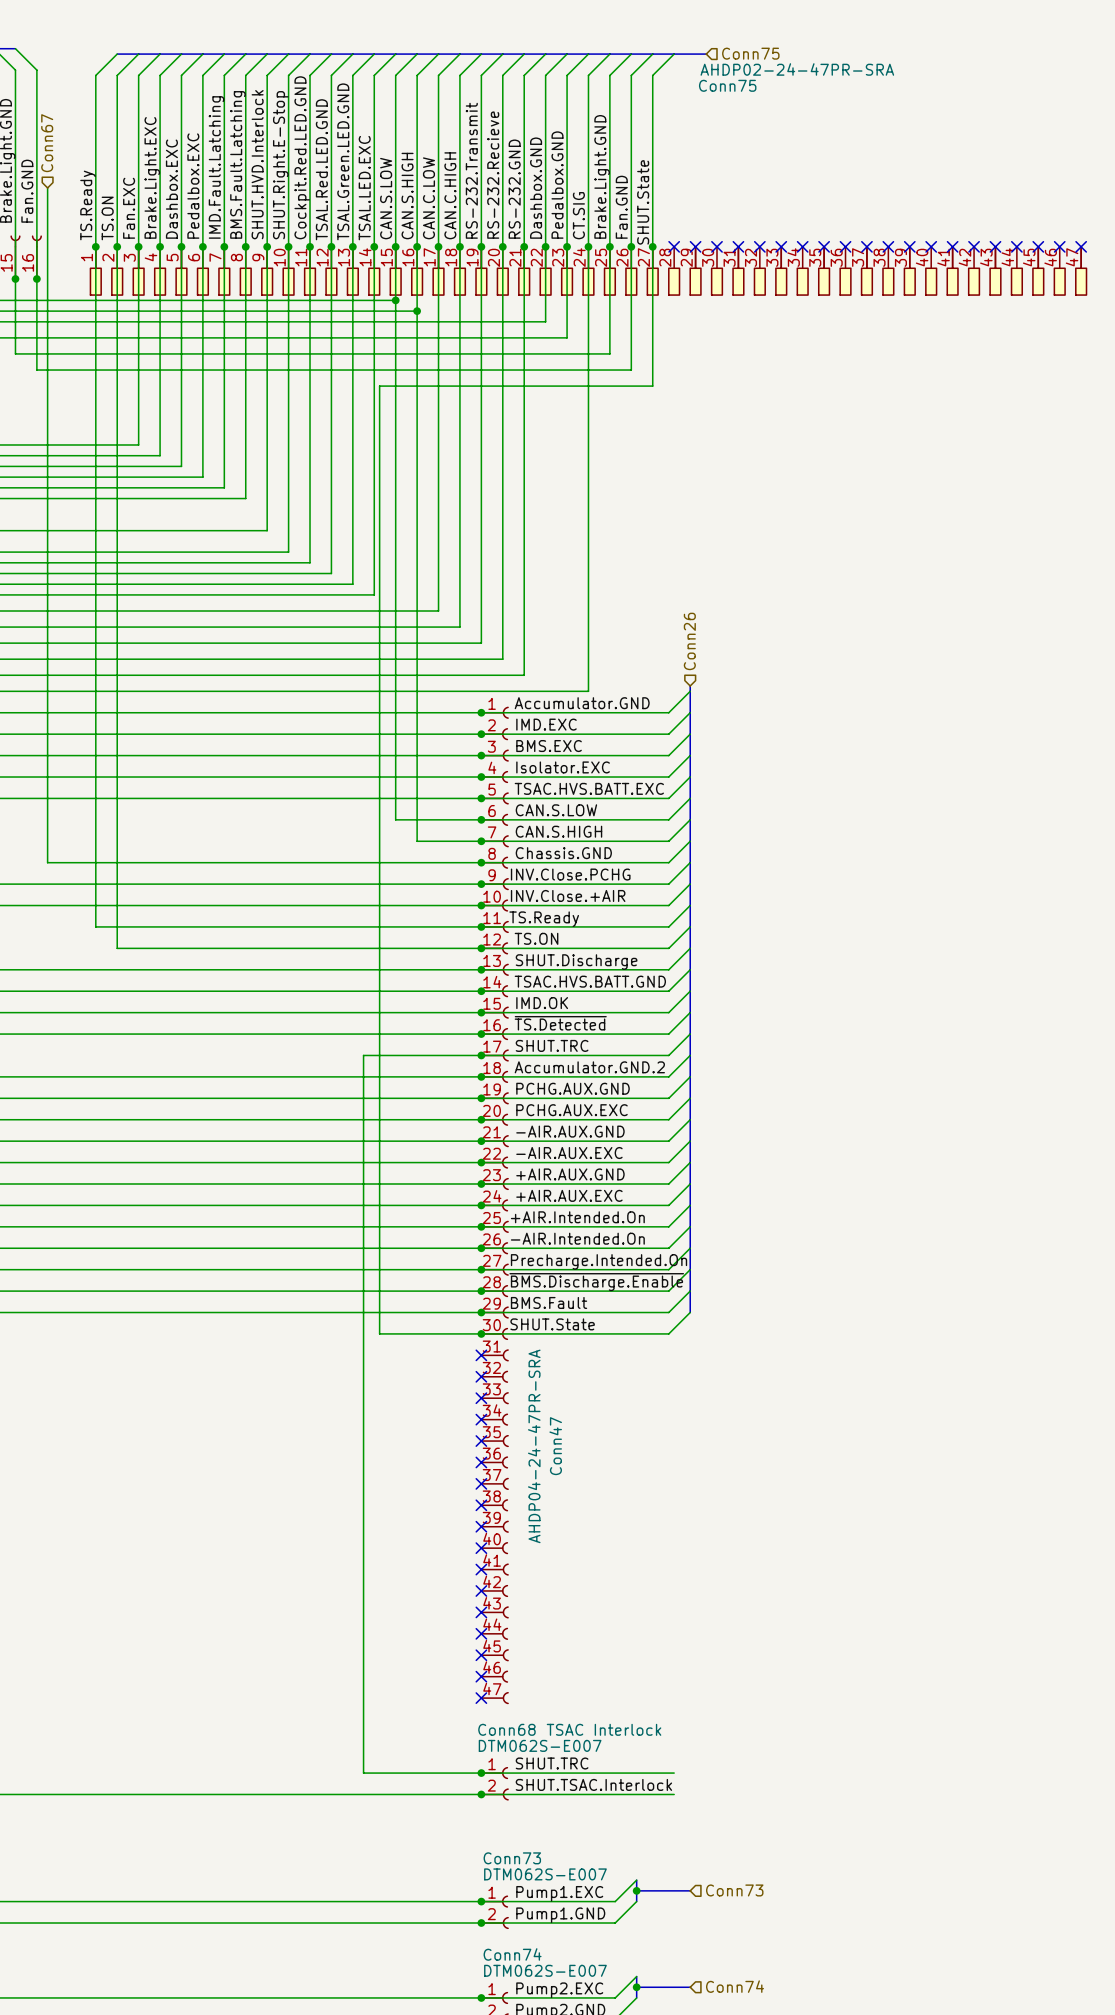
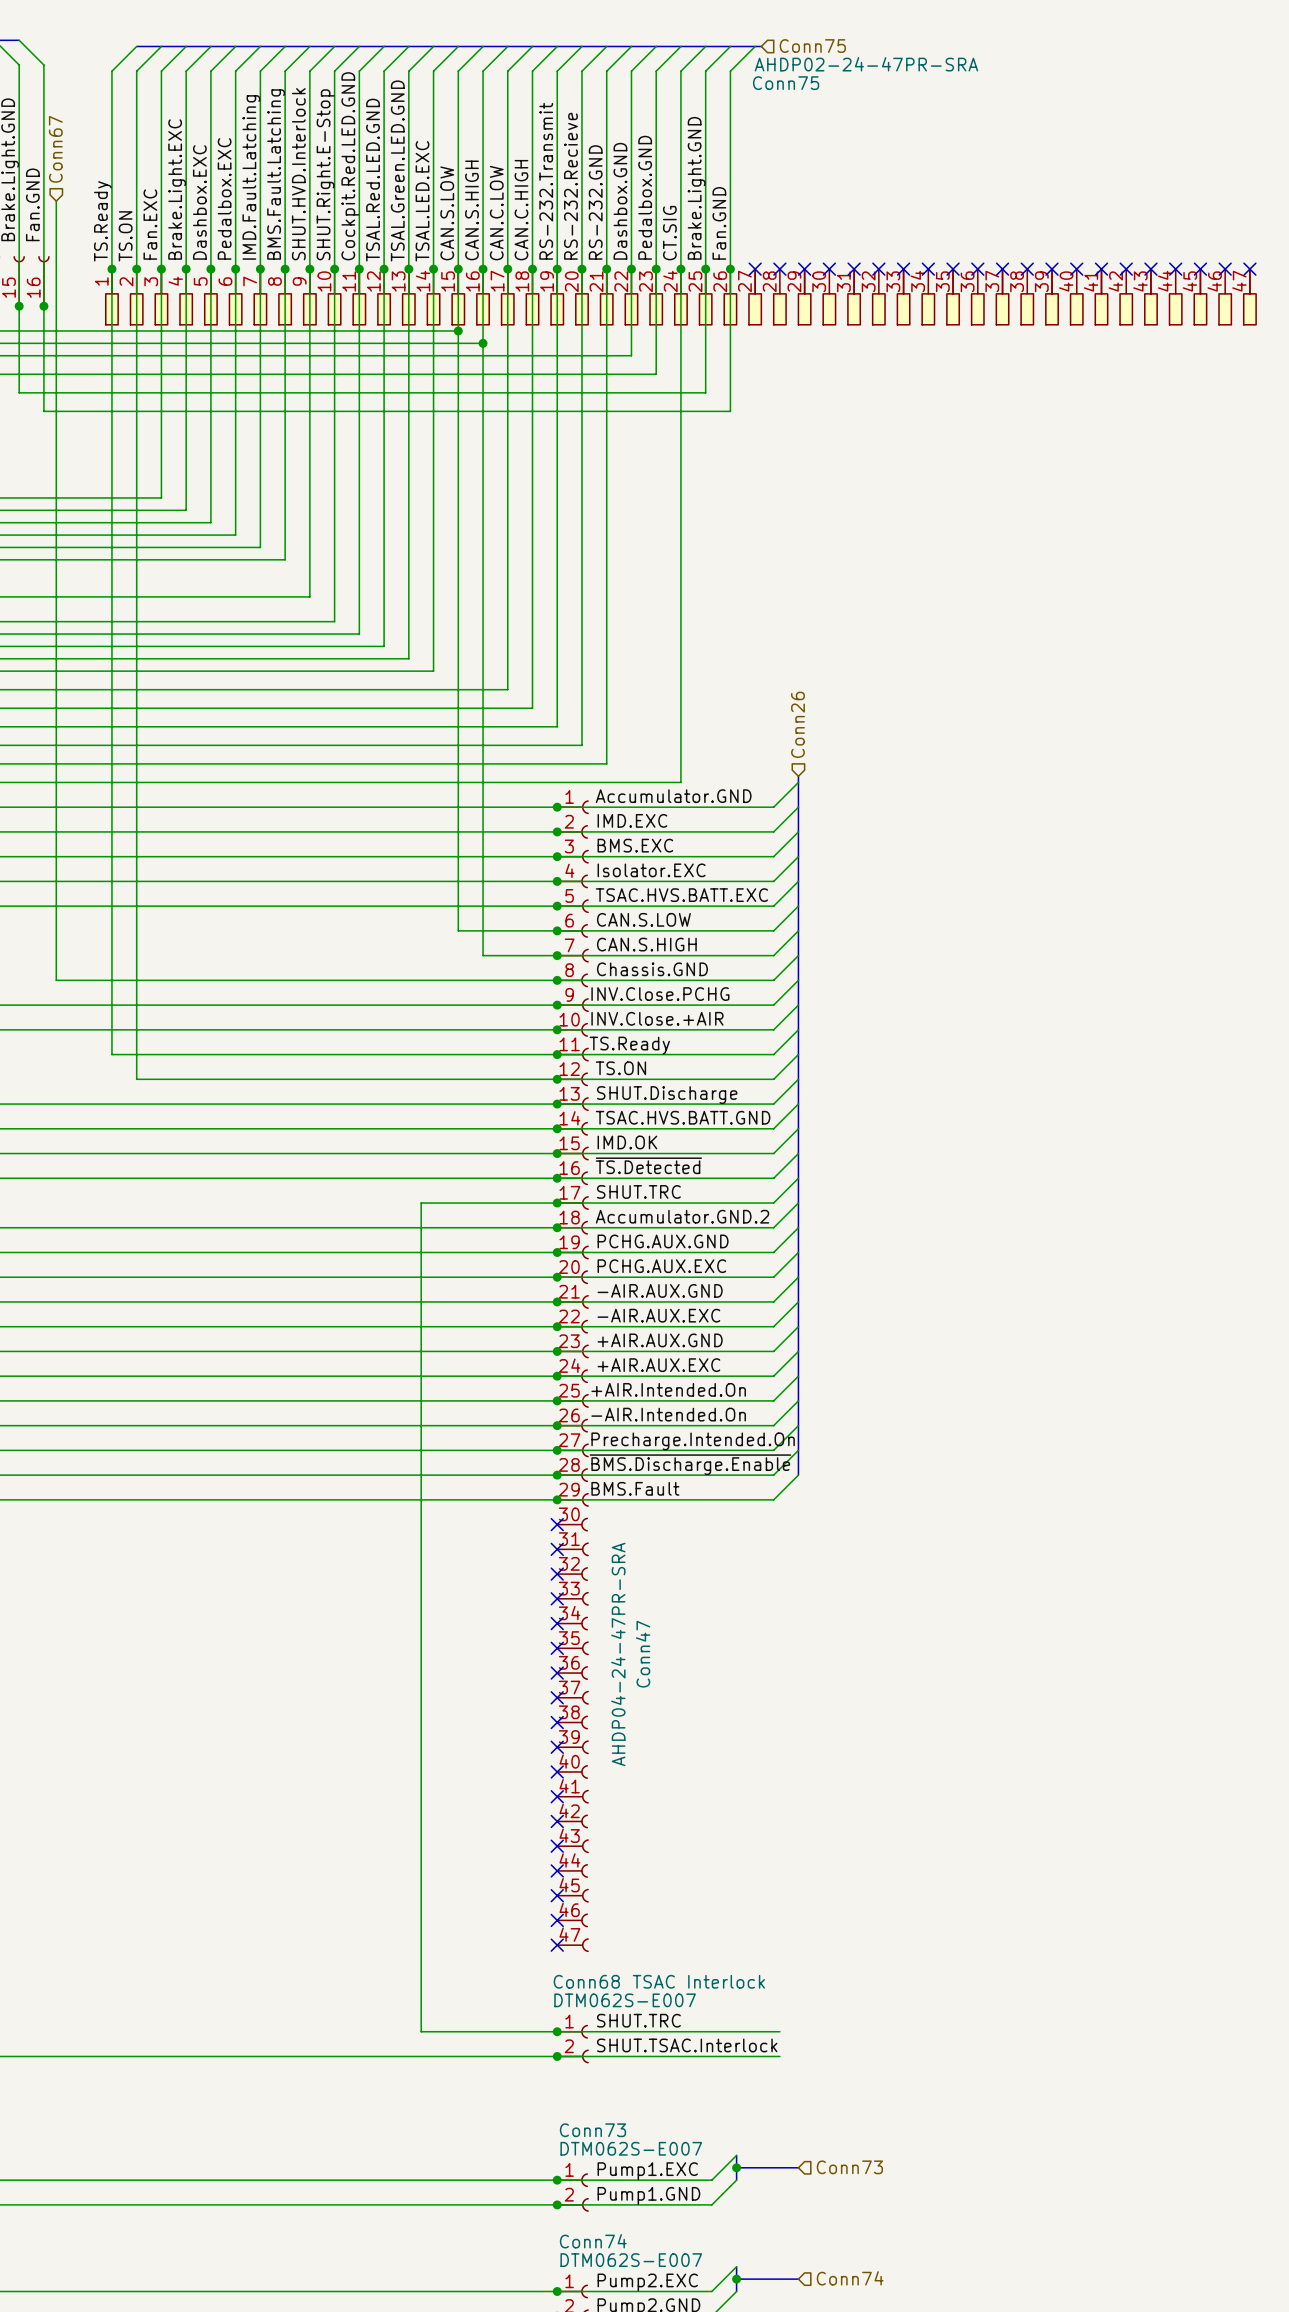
hierarchical label position: Conn75 (750, 53) -> Conn75 (812, 46)
bus: (658, 54) (706, 54) -> none
wire: (674, 54) (652, 75) (652, 386) (379, 386) (379, 1333) (668, 1333) (690, 1312) -> none
Conn75 text position: AHDP02-24-47PR-SRA (797, 69) -> AHDP02-24-47PR-SRA (866, 64)
Conn75 name position: Conn75 (727, 85) -> Conn75 (786, 83)
label: SHUT.State (643, 202) -> none
junction: (652, 246) -> none
no-connect mark: none -> (755, 269)
bus: (690, 1291) (690, 1312) -> none
label: SHUT.State (552, 1324) -> none
junction: (481, 1333) -> none
no-connect mark: none -> (557, 1524)

